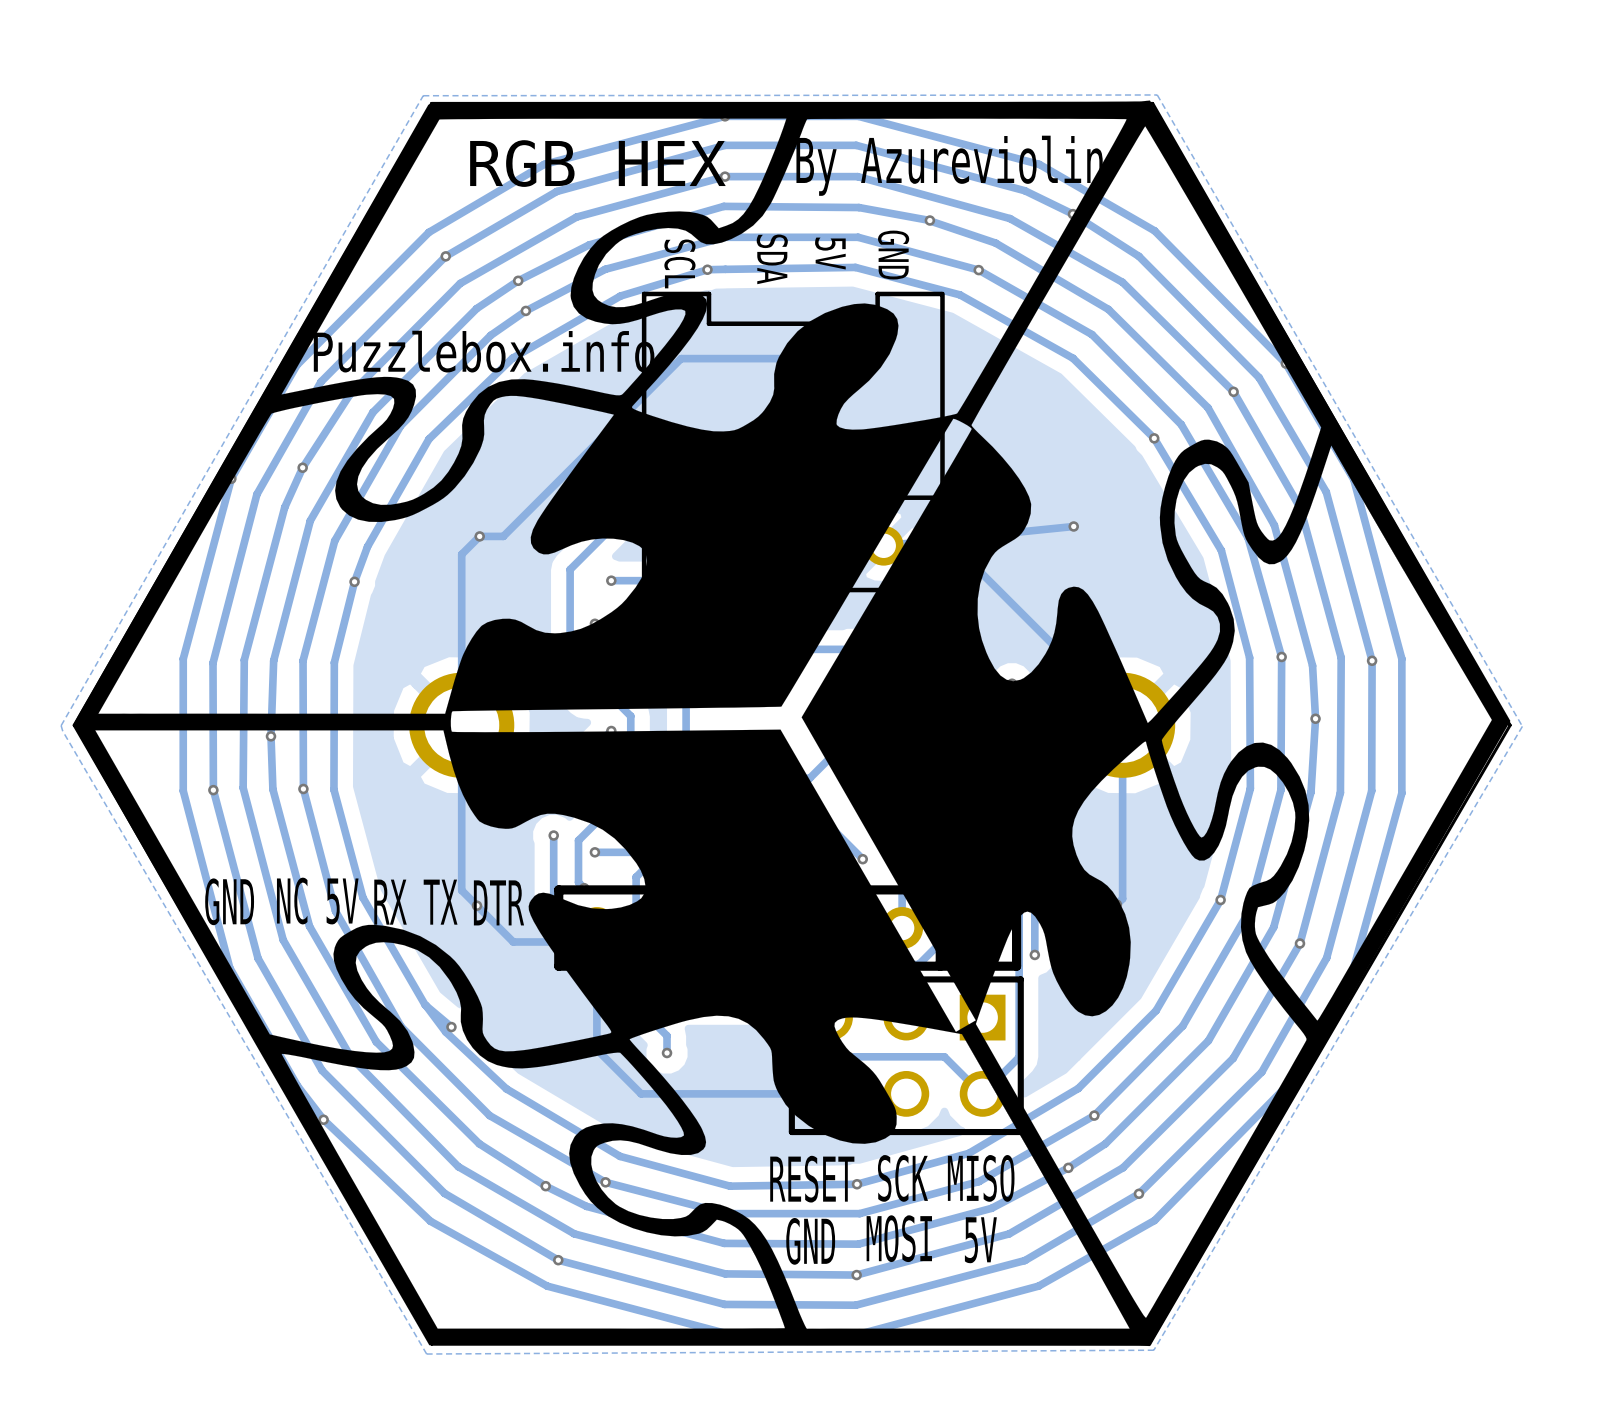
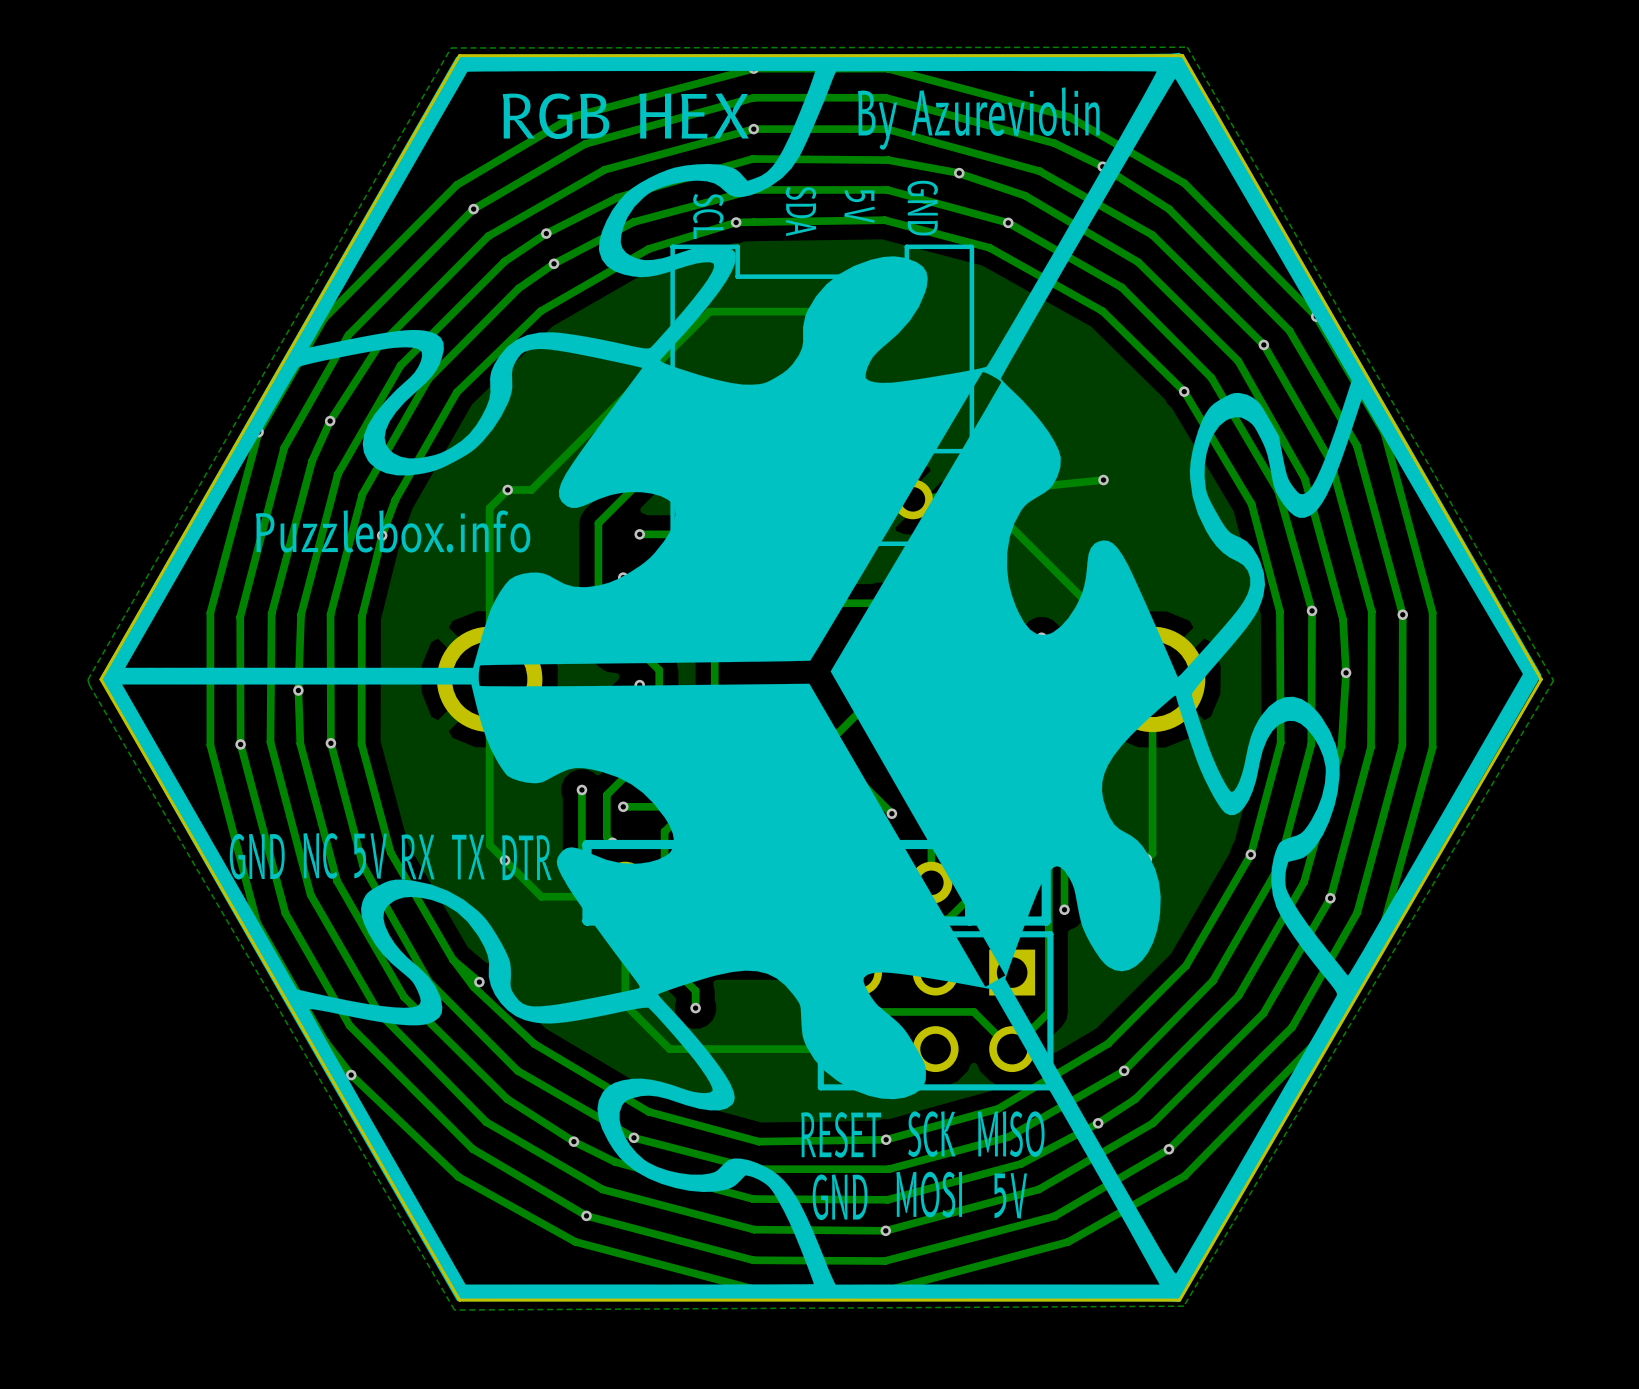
text position: Puzzlebox.info (484, 351) -> Puzzlebox.info (393, 531)

